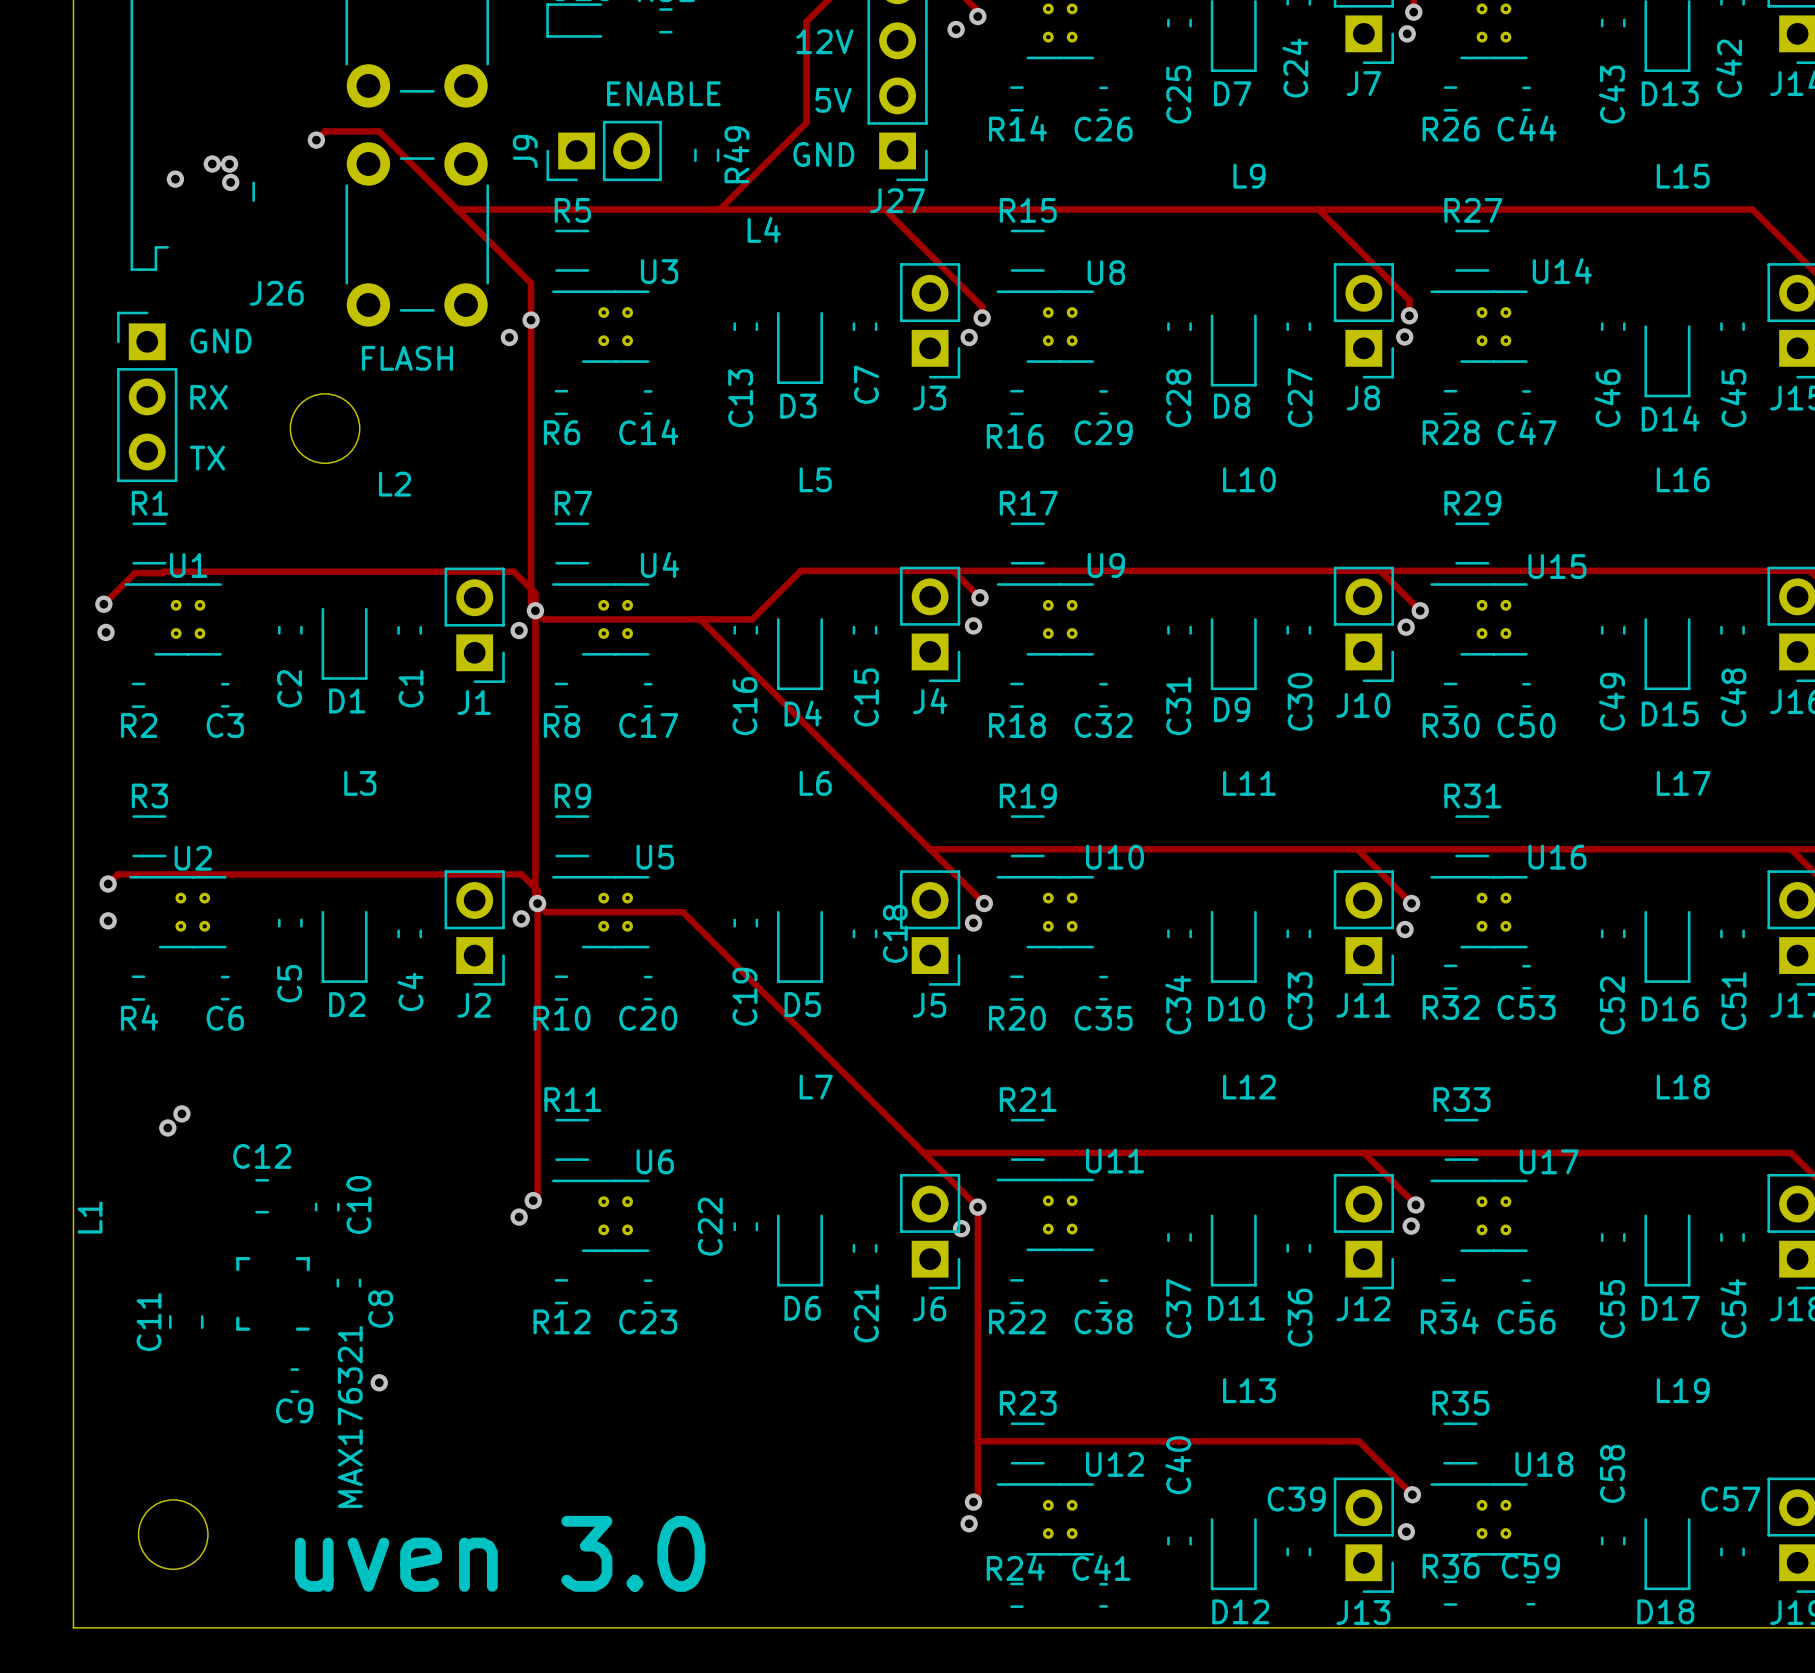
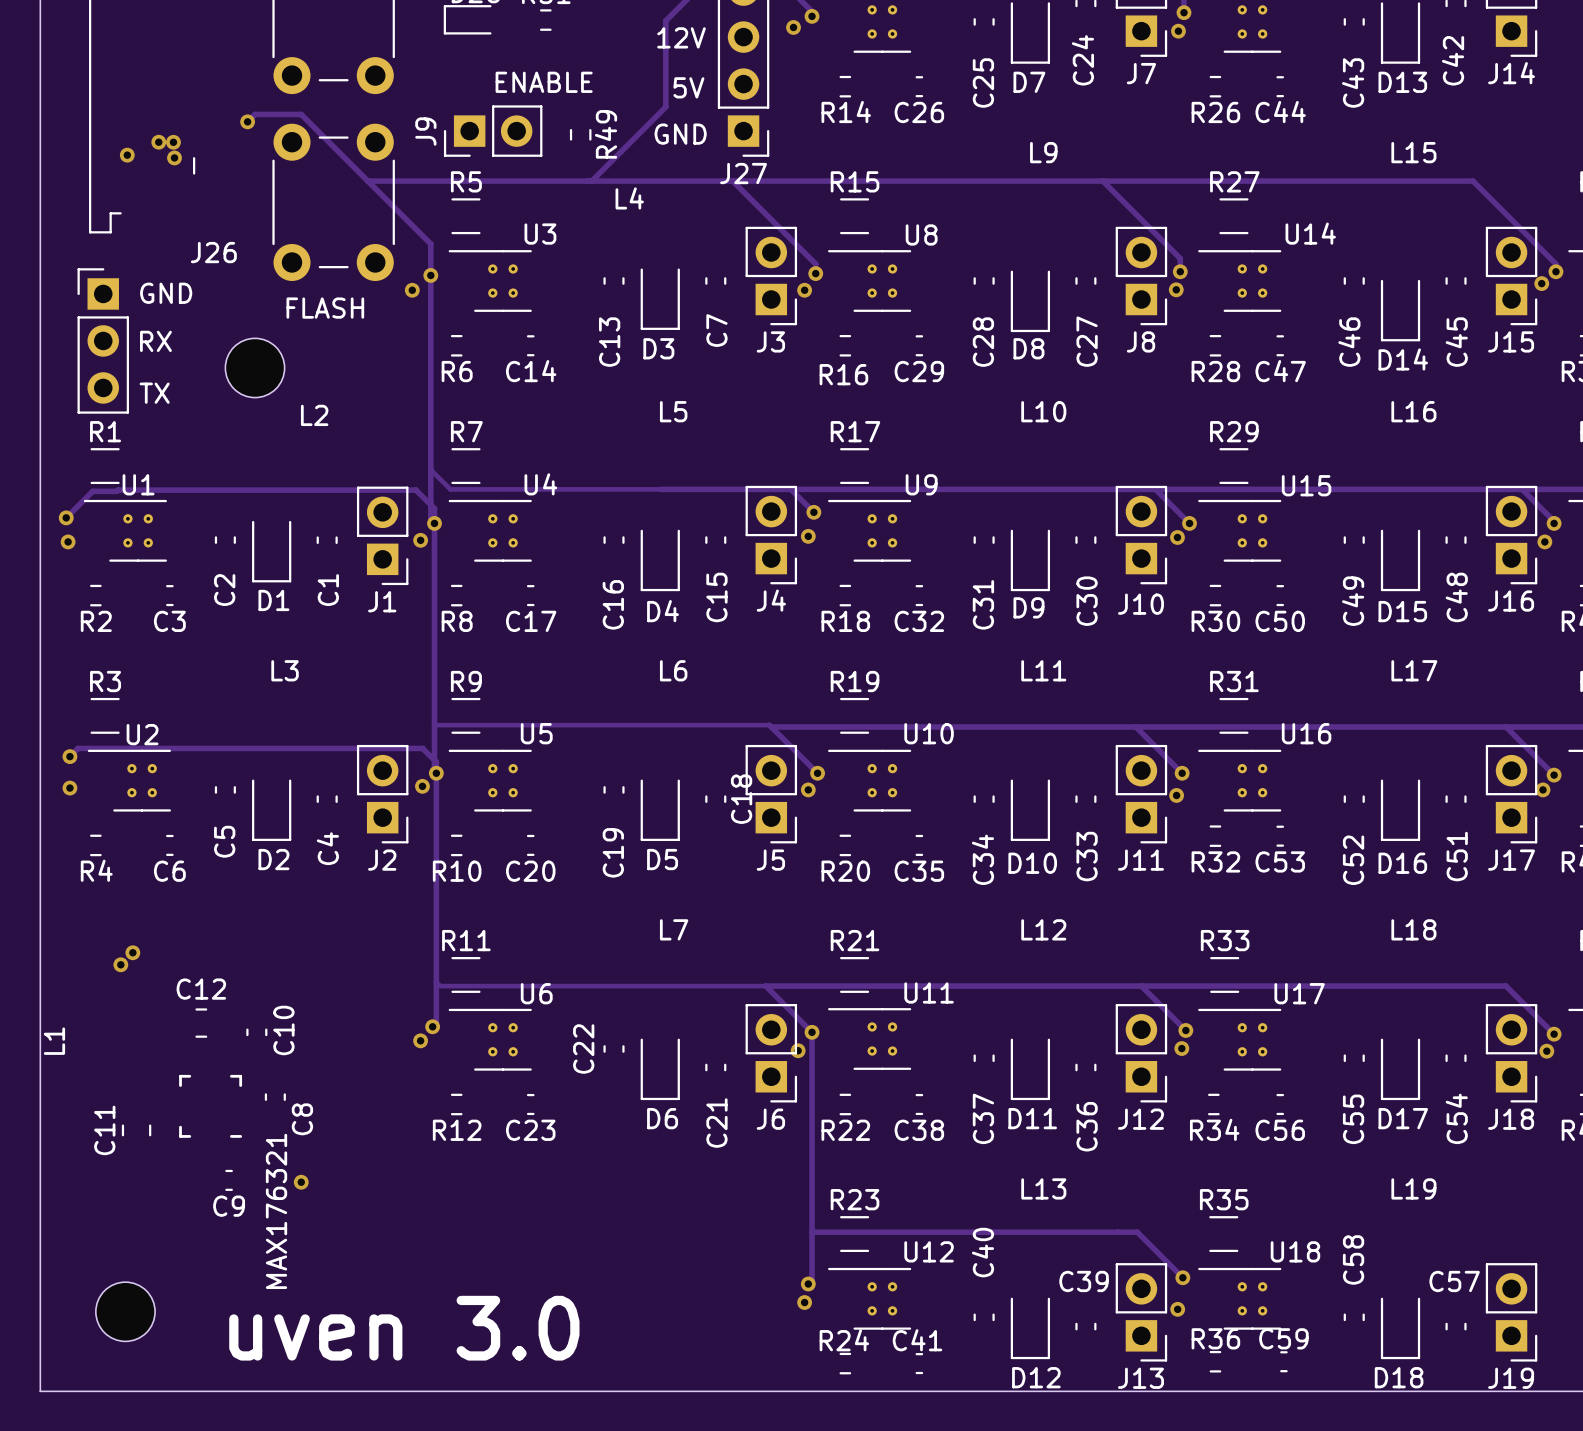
track: (800, 570) (752, 619) (544, 619) (535, 610) -> (661, 489) (450, 489) (430, 469)
track: (700, 619) (927, 847) -> (434, 725) (769, 725)
track: (537, 903) (546, 912) (682, 912) (923, 1152) -> (436, 982) (440, 986) (765, 986)

